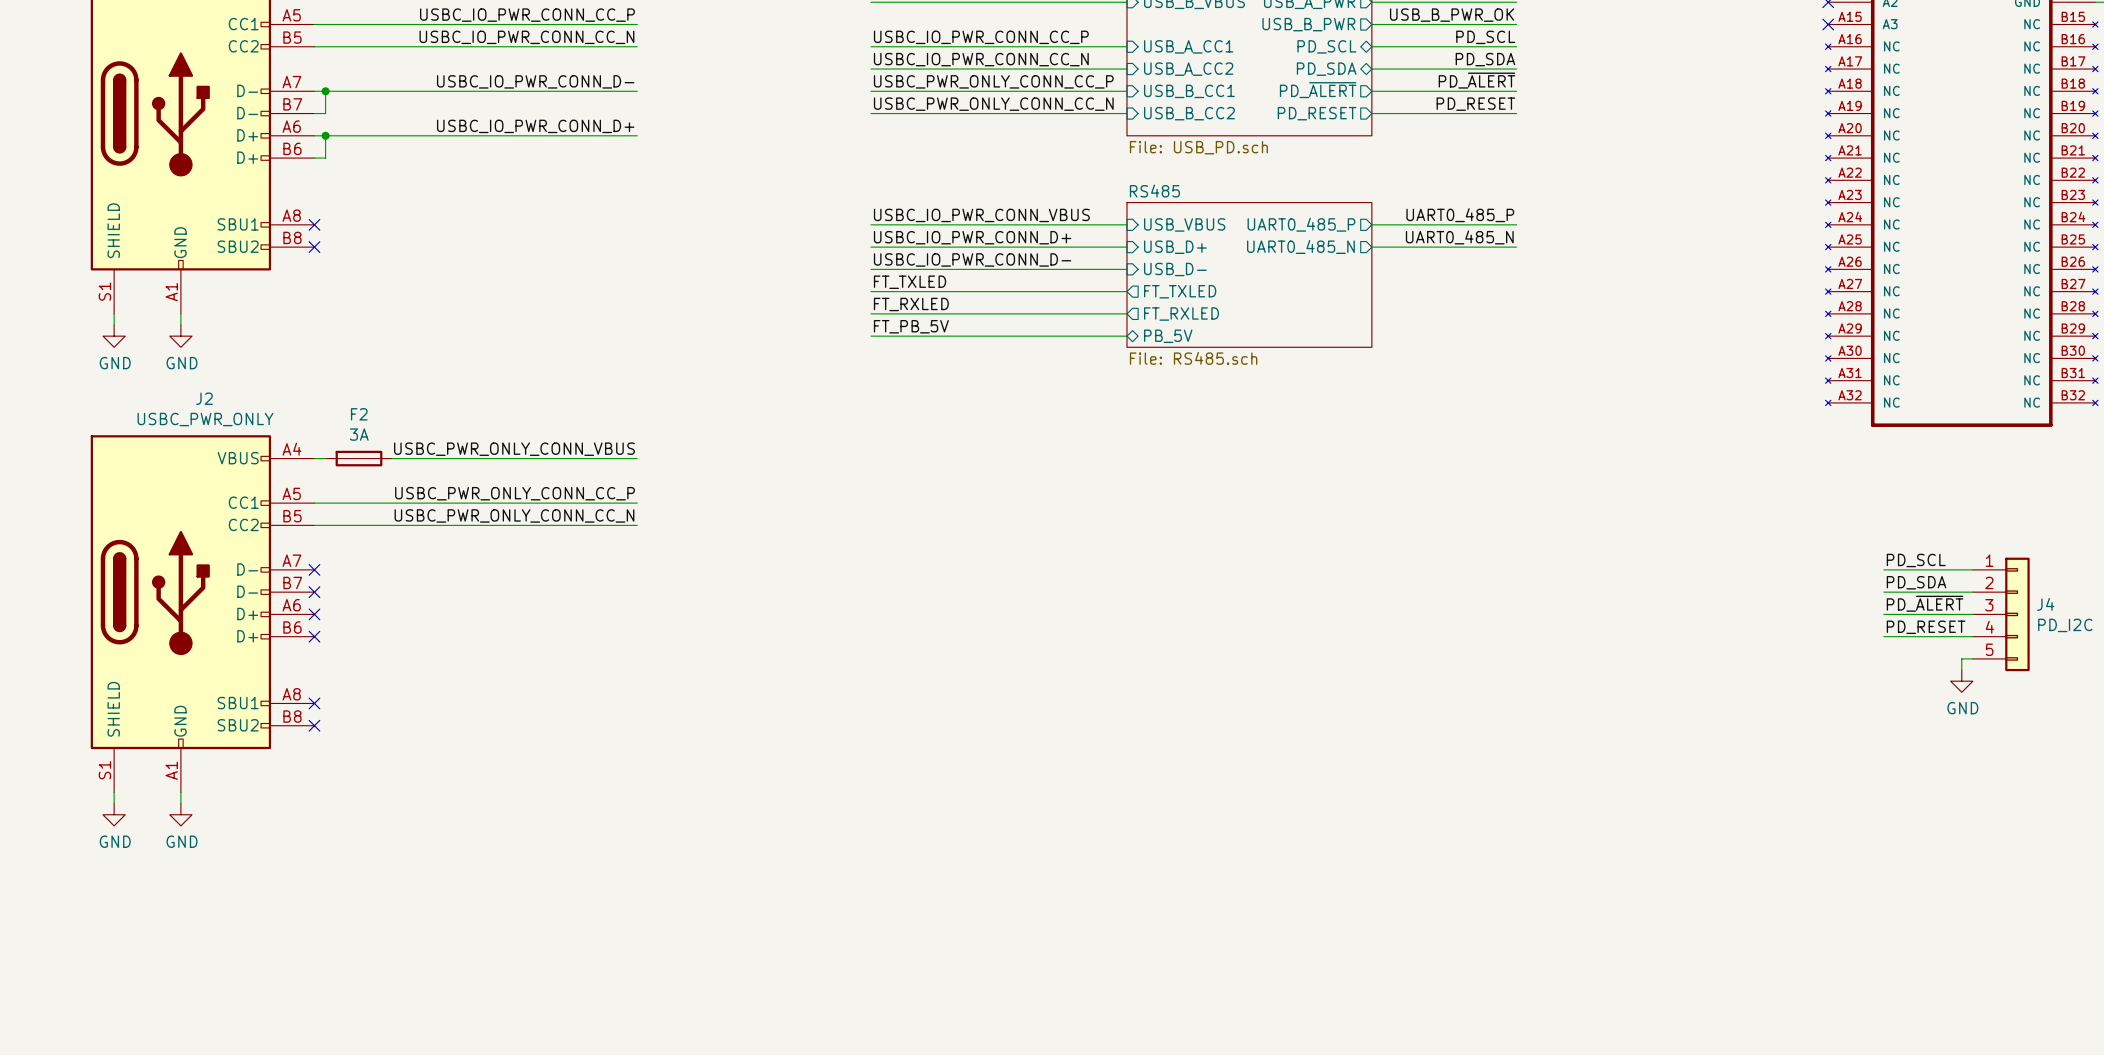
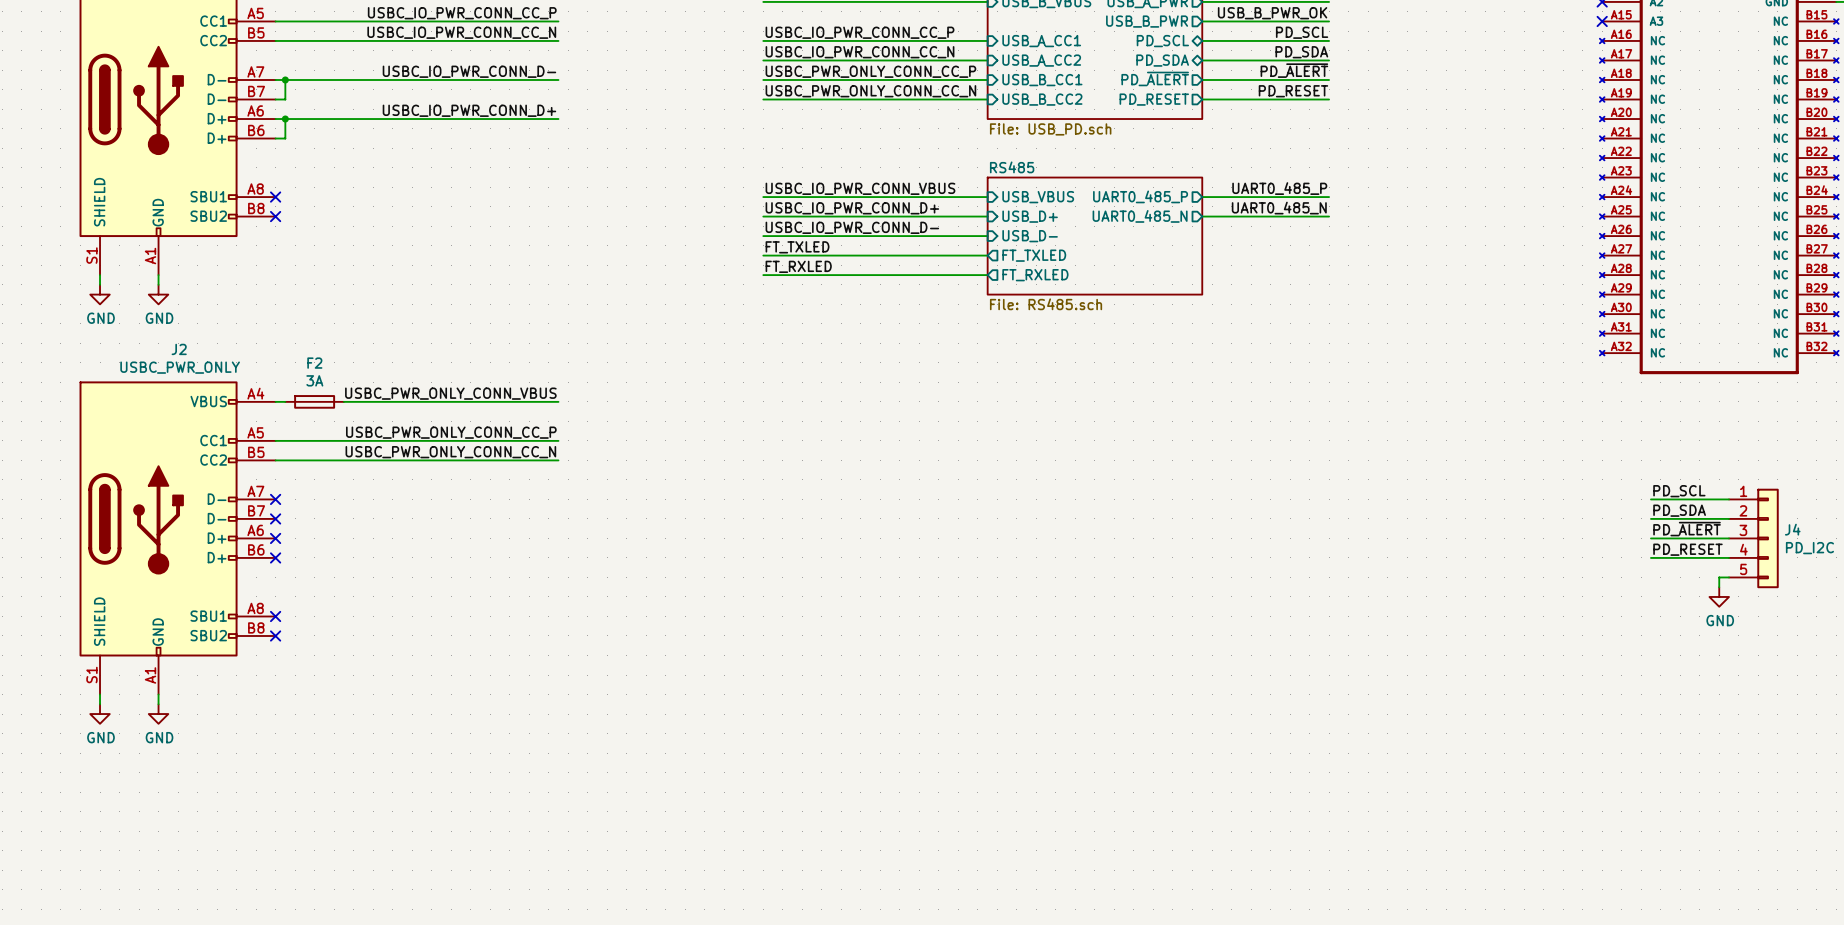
sheet RS485 shape: [1126, 202, 1372, 348] -> [987, 177, 1203, 295]
label: FT_PB_5V (911, 326) -> none
wire: (870, 336) (1126, 336) -> none
sheet pin: PB_5V (1168, 336) -> none

